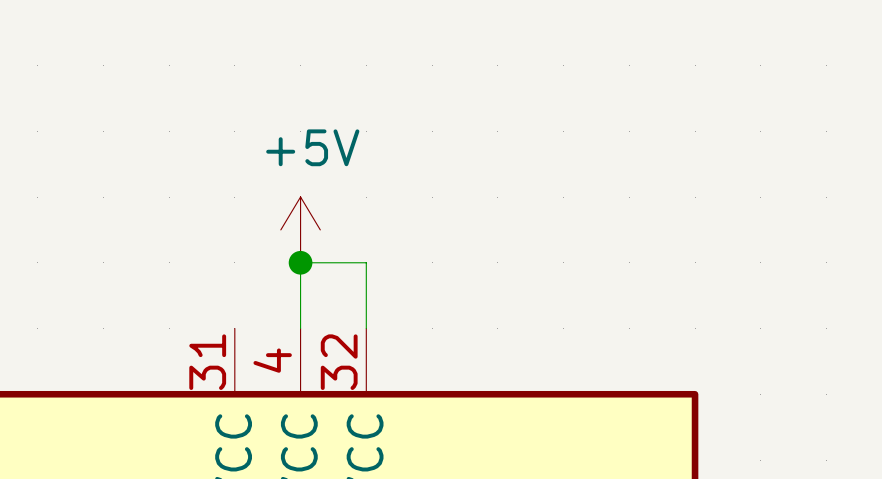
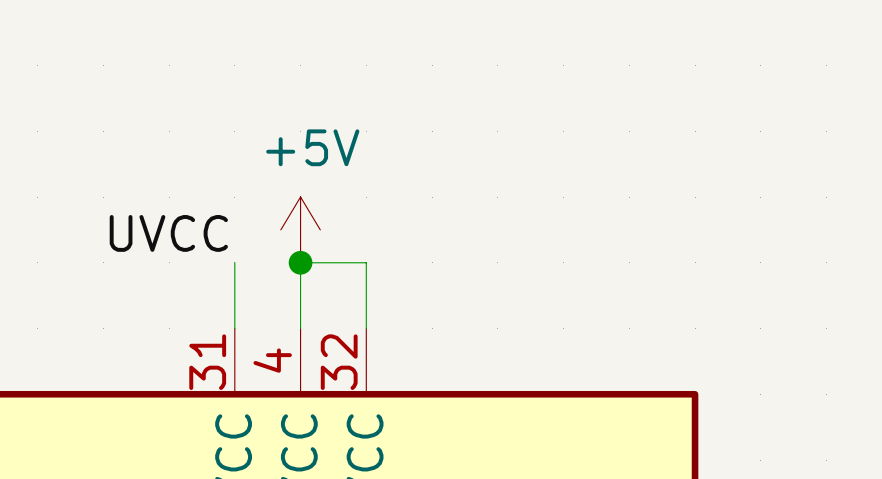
label: none -> UVCC (168, 233)
wire: none -> (234, 262) (234, 328)

